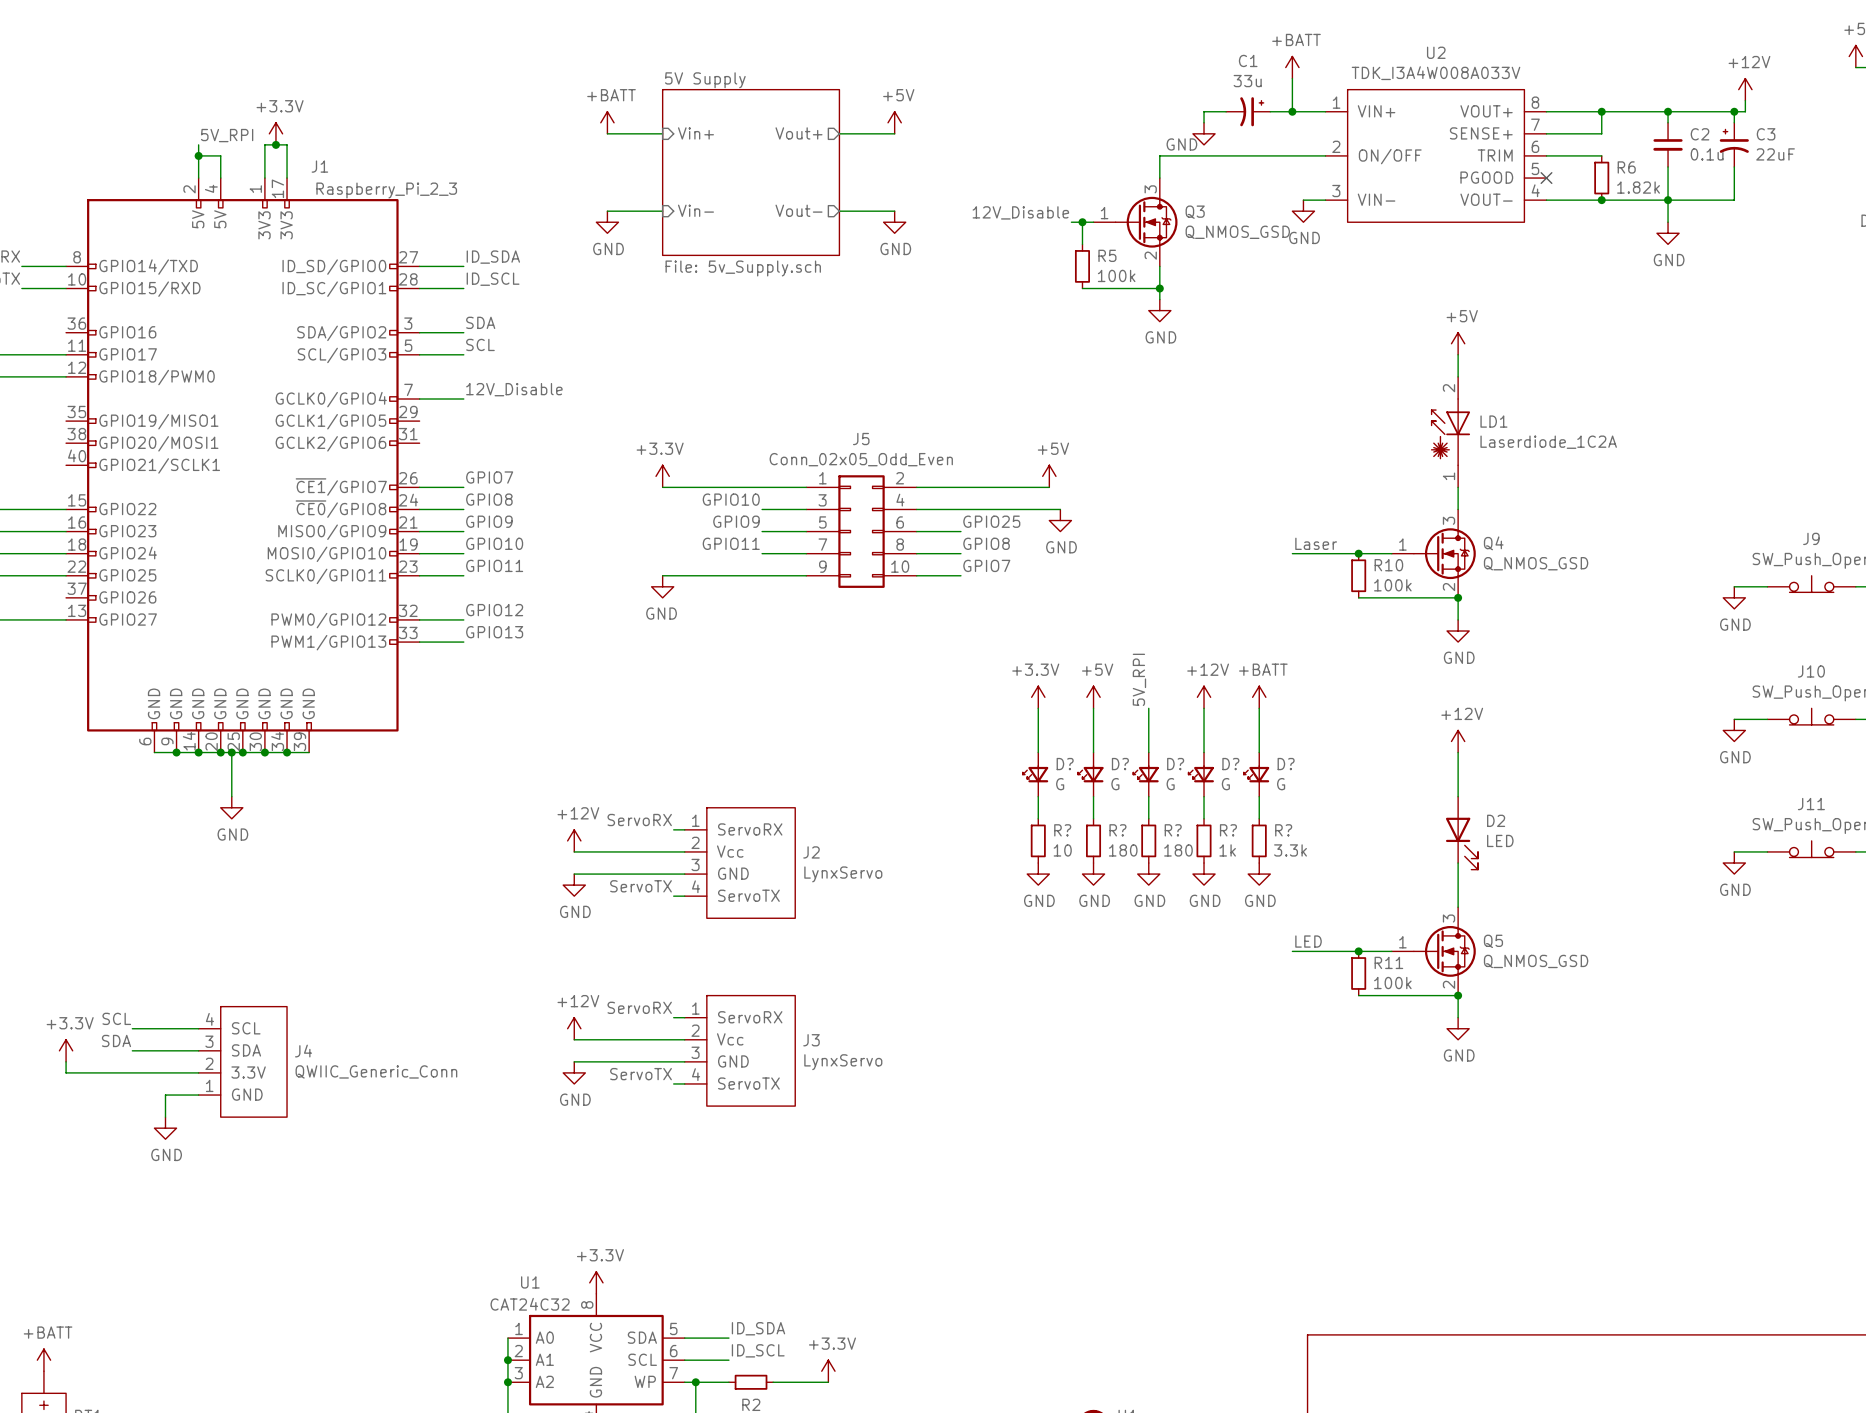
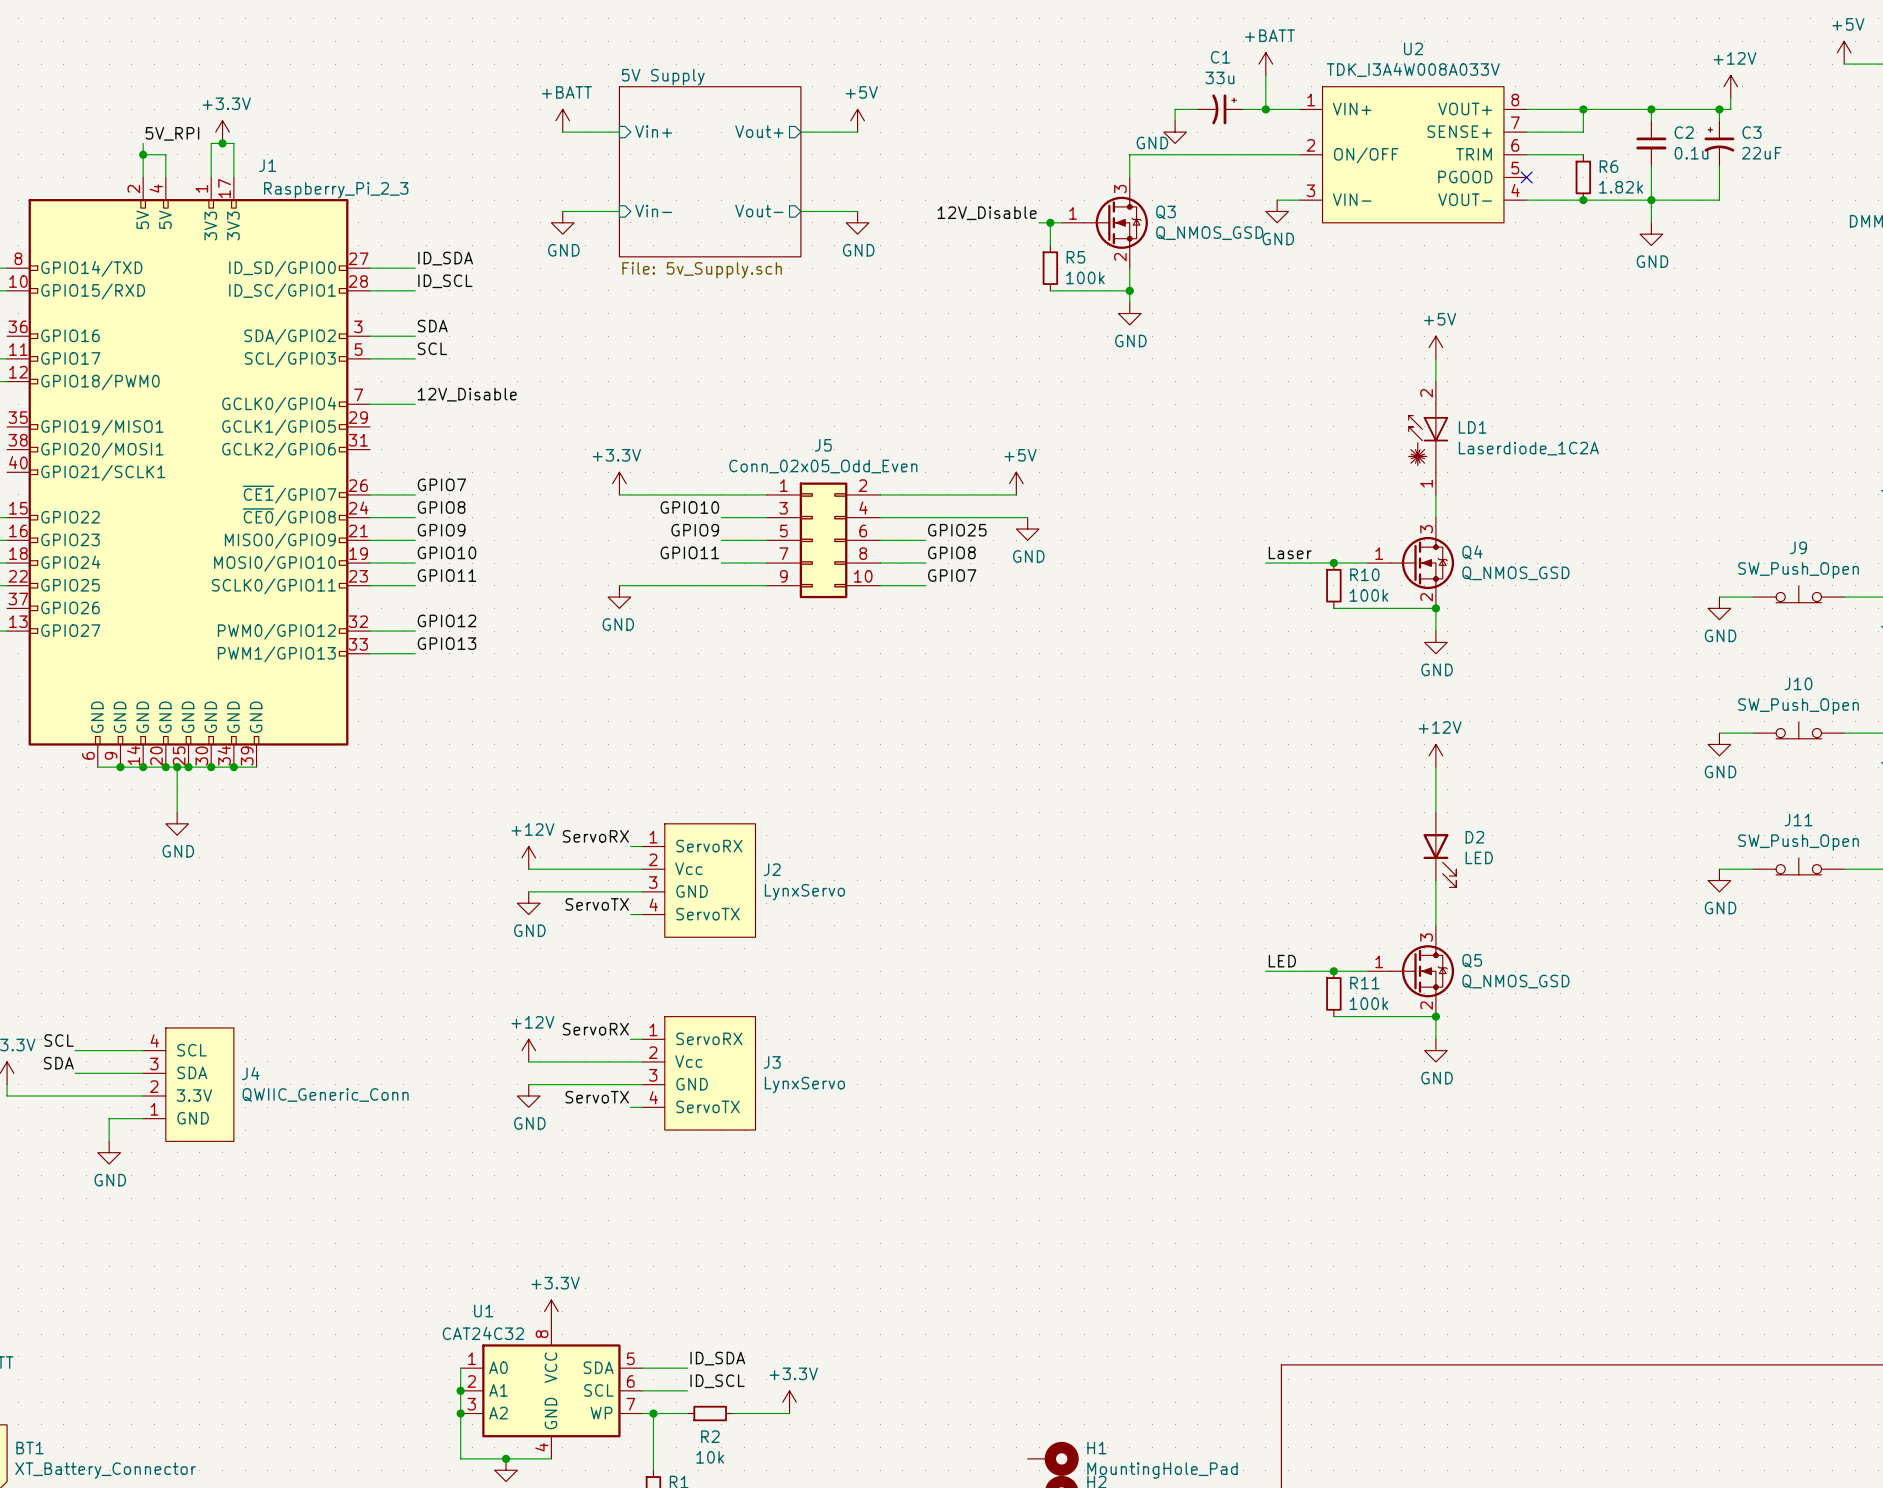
label: 5V_RPI (1139, 679) -> none
power symbol: +3.3V (1038, 697) -> none
power symbol: +5V (1093, 697) -> none
power symbol: +12V (1204, 697) -> none
power symbol: +BATT (1259, 697) -> none
wire: (1038, 708) (1038, 752) -> none
wire: (1093, 708) (1093, 752) -> none
wire: (1148, 708) (1148, 752) -> none
wire: (1204, 708) (1204, 752) -> none
wire: (1259, 708) (1259, 752) -> none
D?: G (1035, 774) -> none
D?: G (1090, 774) -> none
D?: G (1146, 774) -> none
D?: G (1201, 774) -> none
D?: G (1256, 774) -> none
wire: (1038, 796) (1038, 818) -> none
wire: (1093, 796) (1093, 818) -> none
wire: (1148, 796) (1148, 818) -> none
wire: (1204, 796) (1204, 818) -> none
wire: (1259, 796) (1259, 818) -> none
R?: 10 (1038, 840) -> none
R?: 180 (1093, 840) -> none
R?: 180 (1148, 840) -> none
R?: 1k (1204, 840) -> none
R?: 3.3k (1259, 840) -> none
power symbol: GND (1038, 874) -> none
power symbol: GND (1093, 874) -> none
power symbol: GND (1148, 874) -> none
power symbol: GND (1204, 874) -> none
power symbol: GND (1259, 874) -> none

